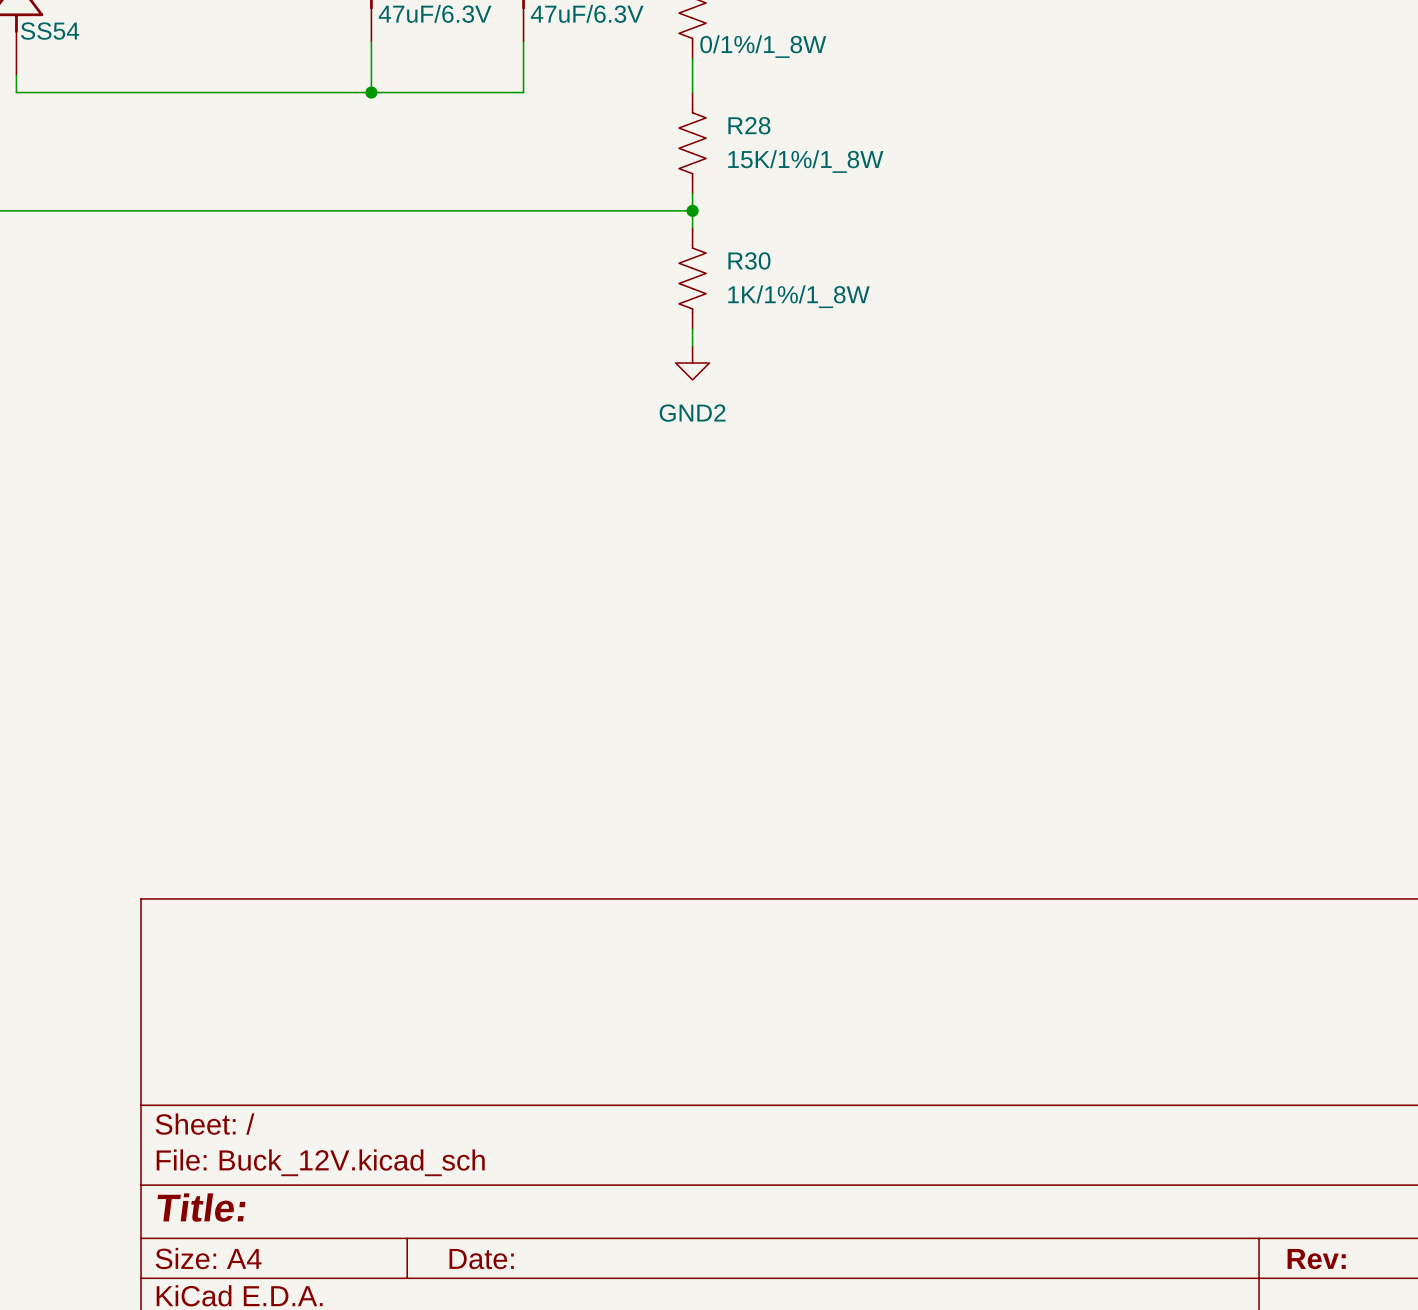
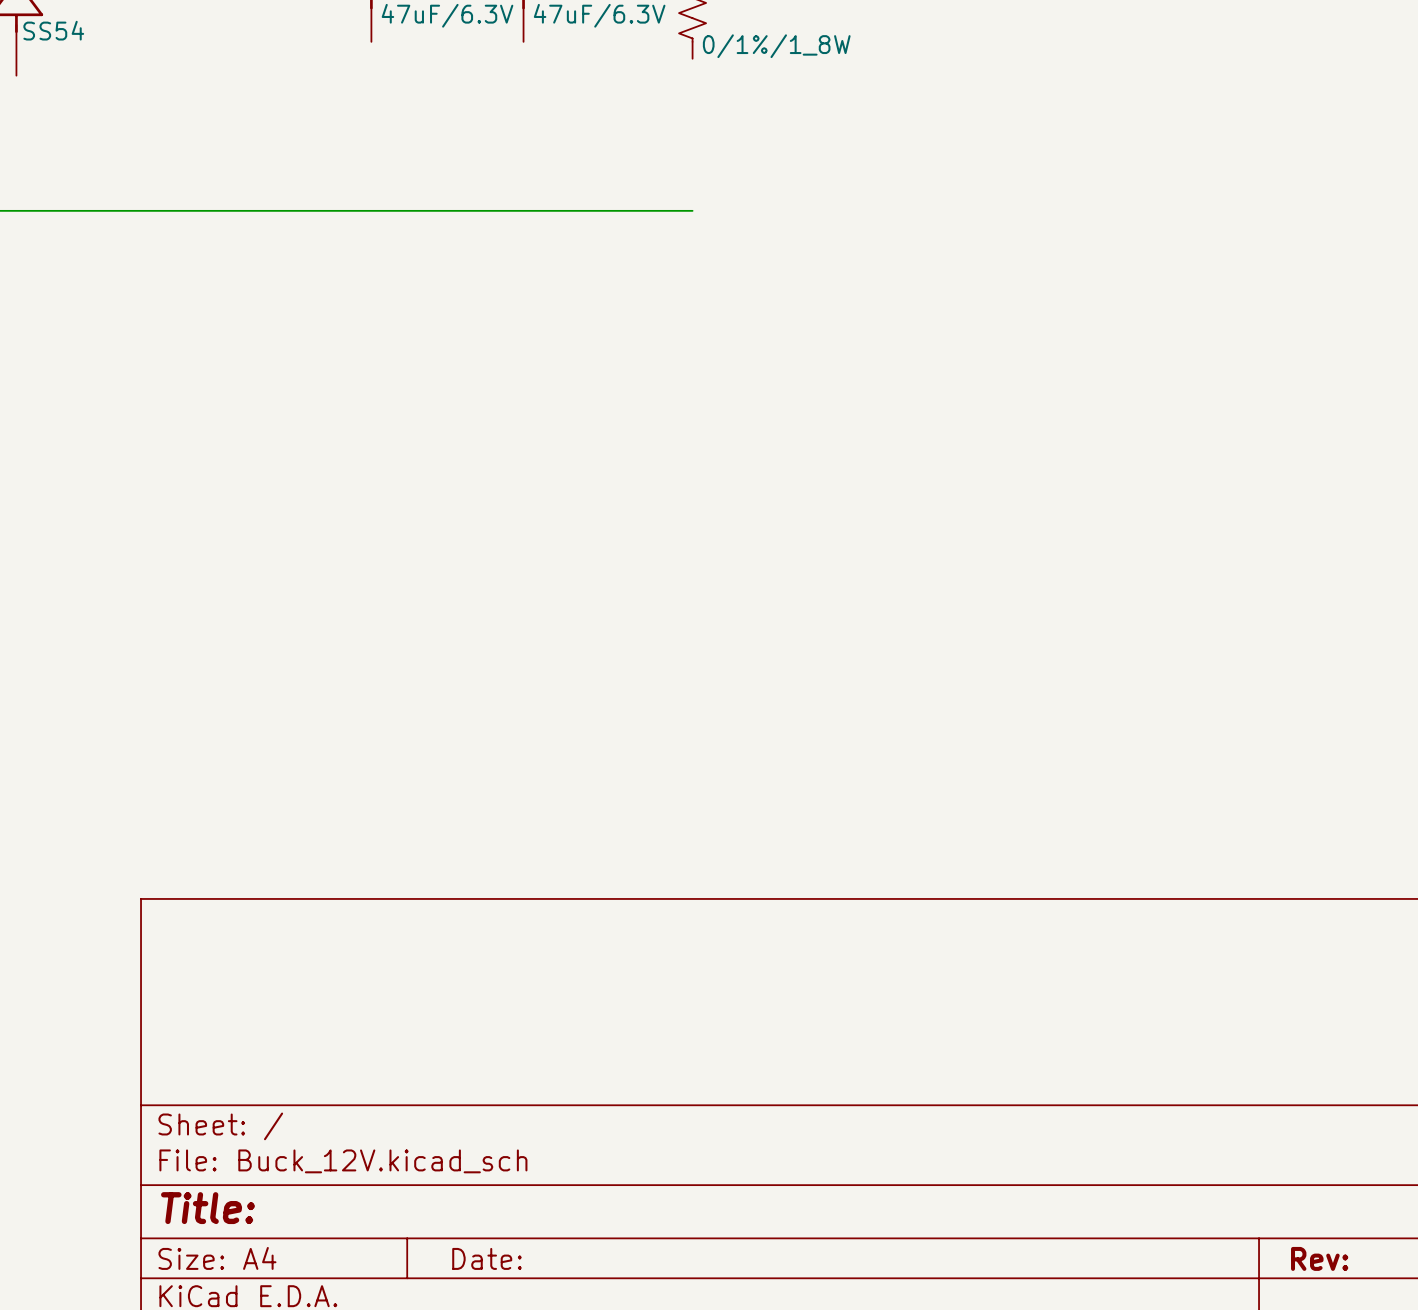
wire: (371, 41) (371, 92) -> none
wire: (523, 41) (523, 92) (16, 92) (16, 75) -> none
wire: (692, 58) (692, 92) -> none
junction: (371, 92) -> none
R28: 15K/1%/1_8W (692, 143) -> none
wire: (692, 193) (692, 227) -> none
junction: (692, 210) -> none
R30: 1K/1%/1_8W (692, 278) -> none
wire: (692, 329) (692, 346) -> none
power symbol: GND2 (692, 362) -> none

